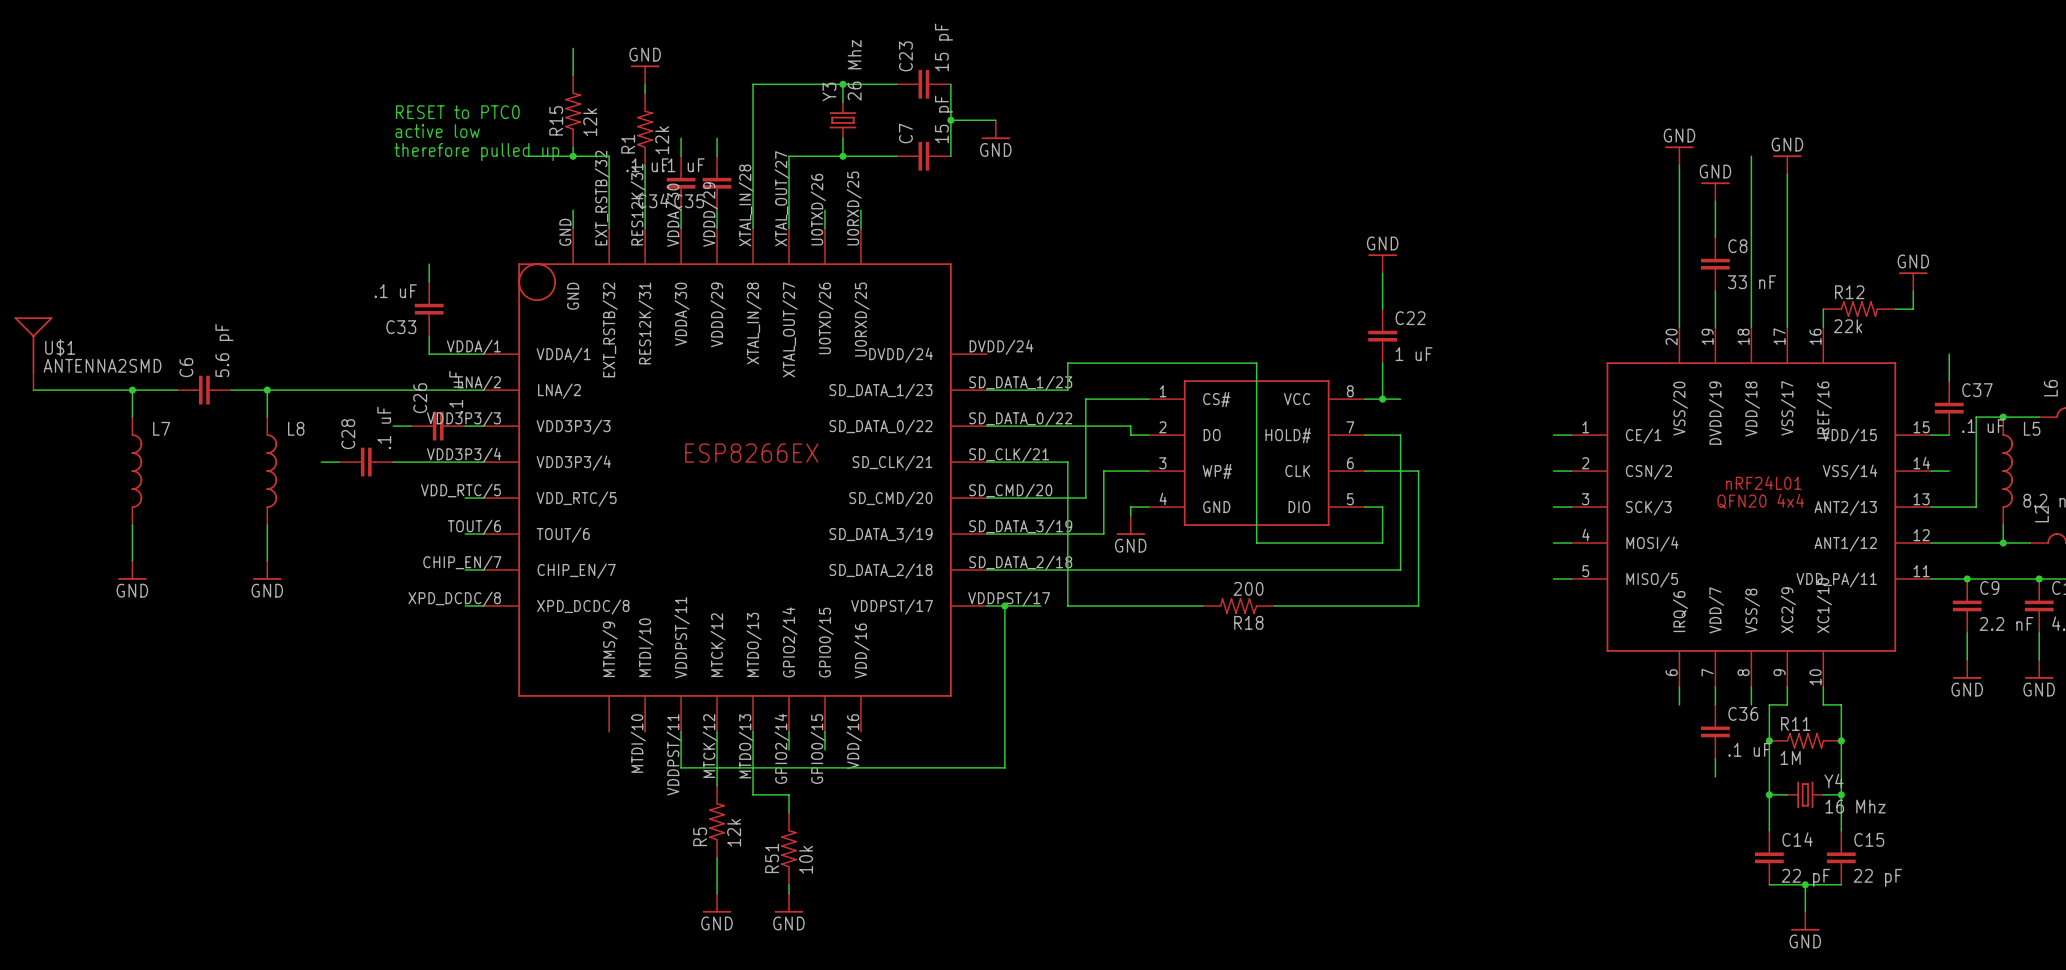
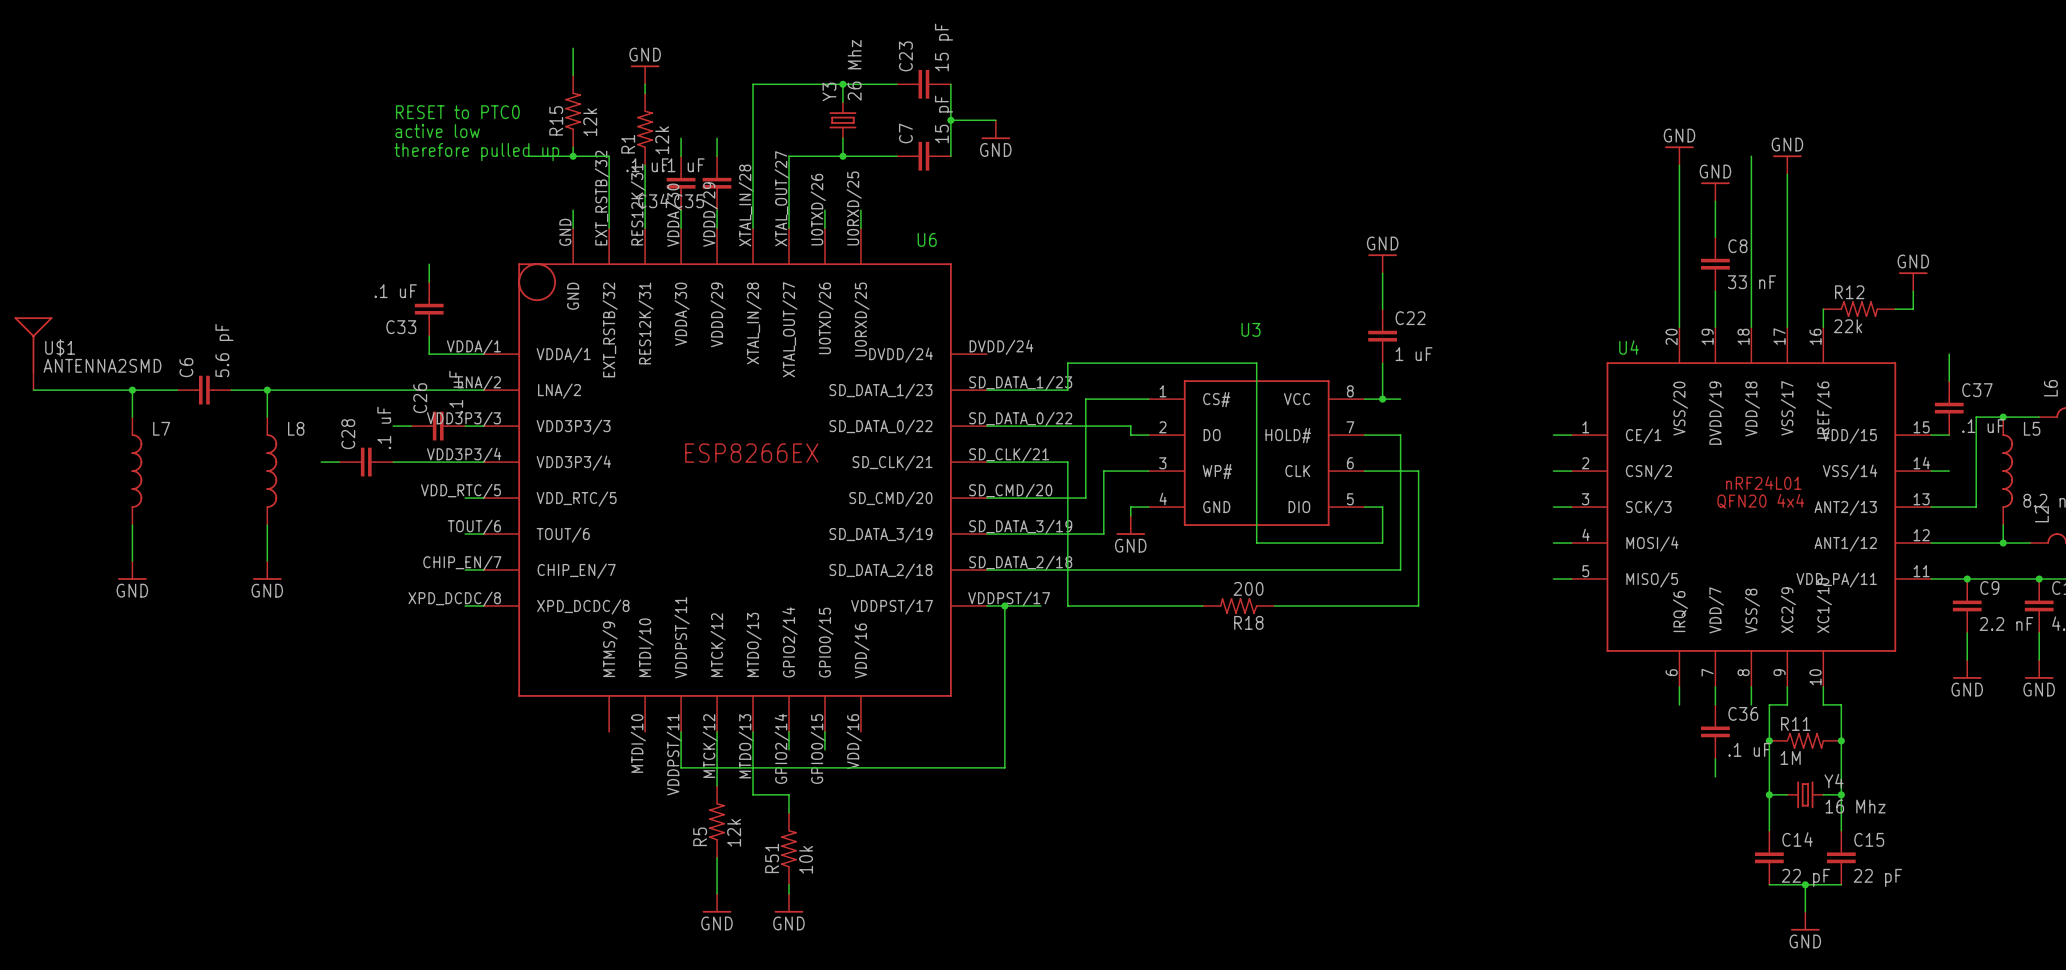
text: none -> U6 (927, 239)
text: none -> U3 (1250, 329)
text: none -> U4 (1629, 347)

